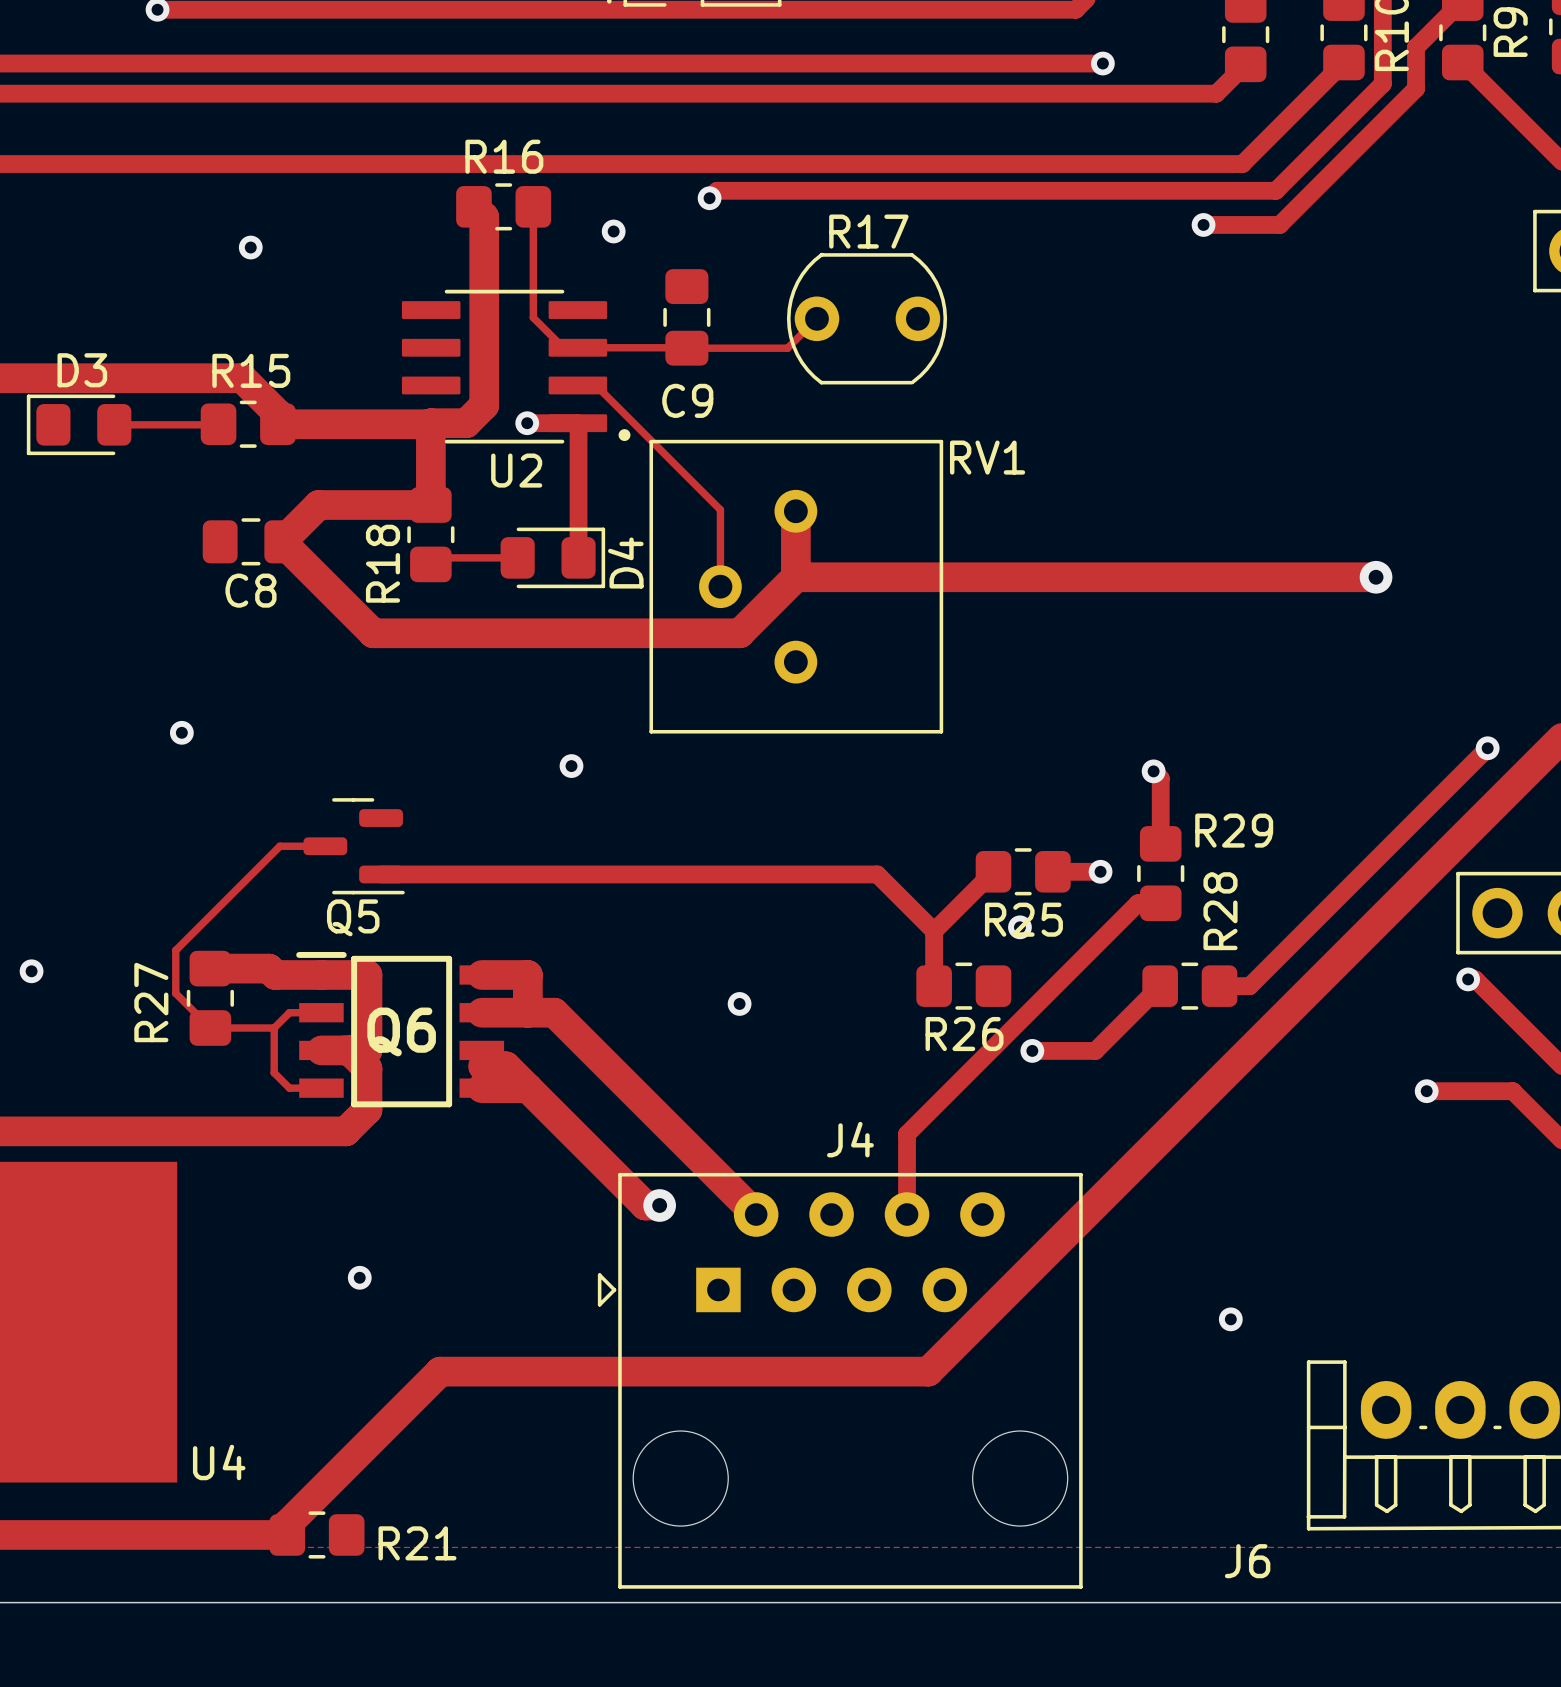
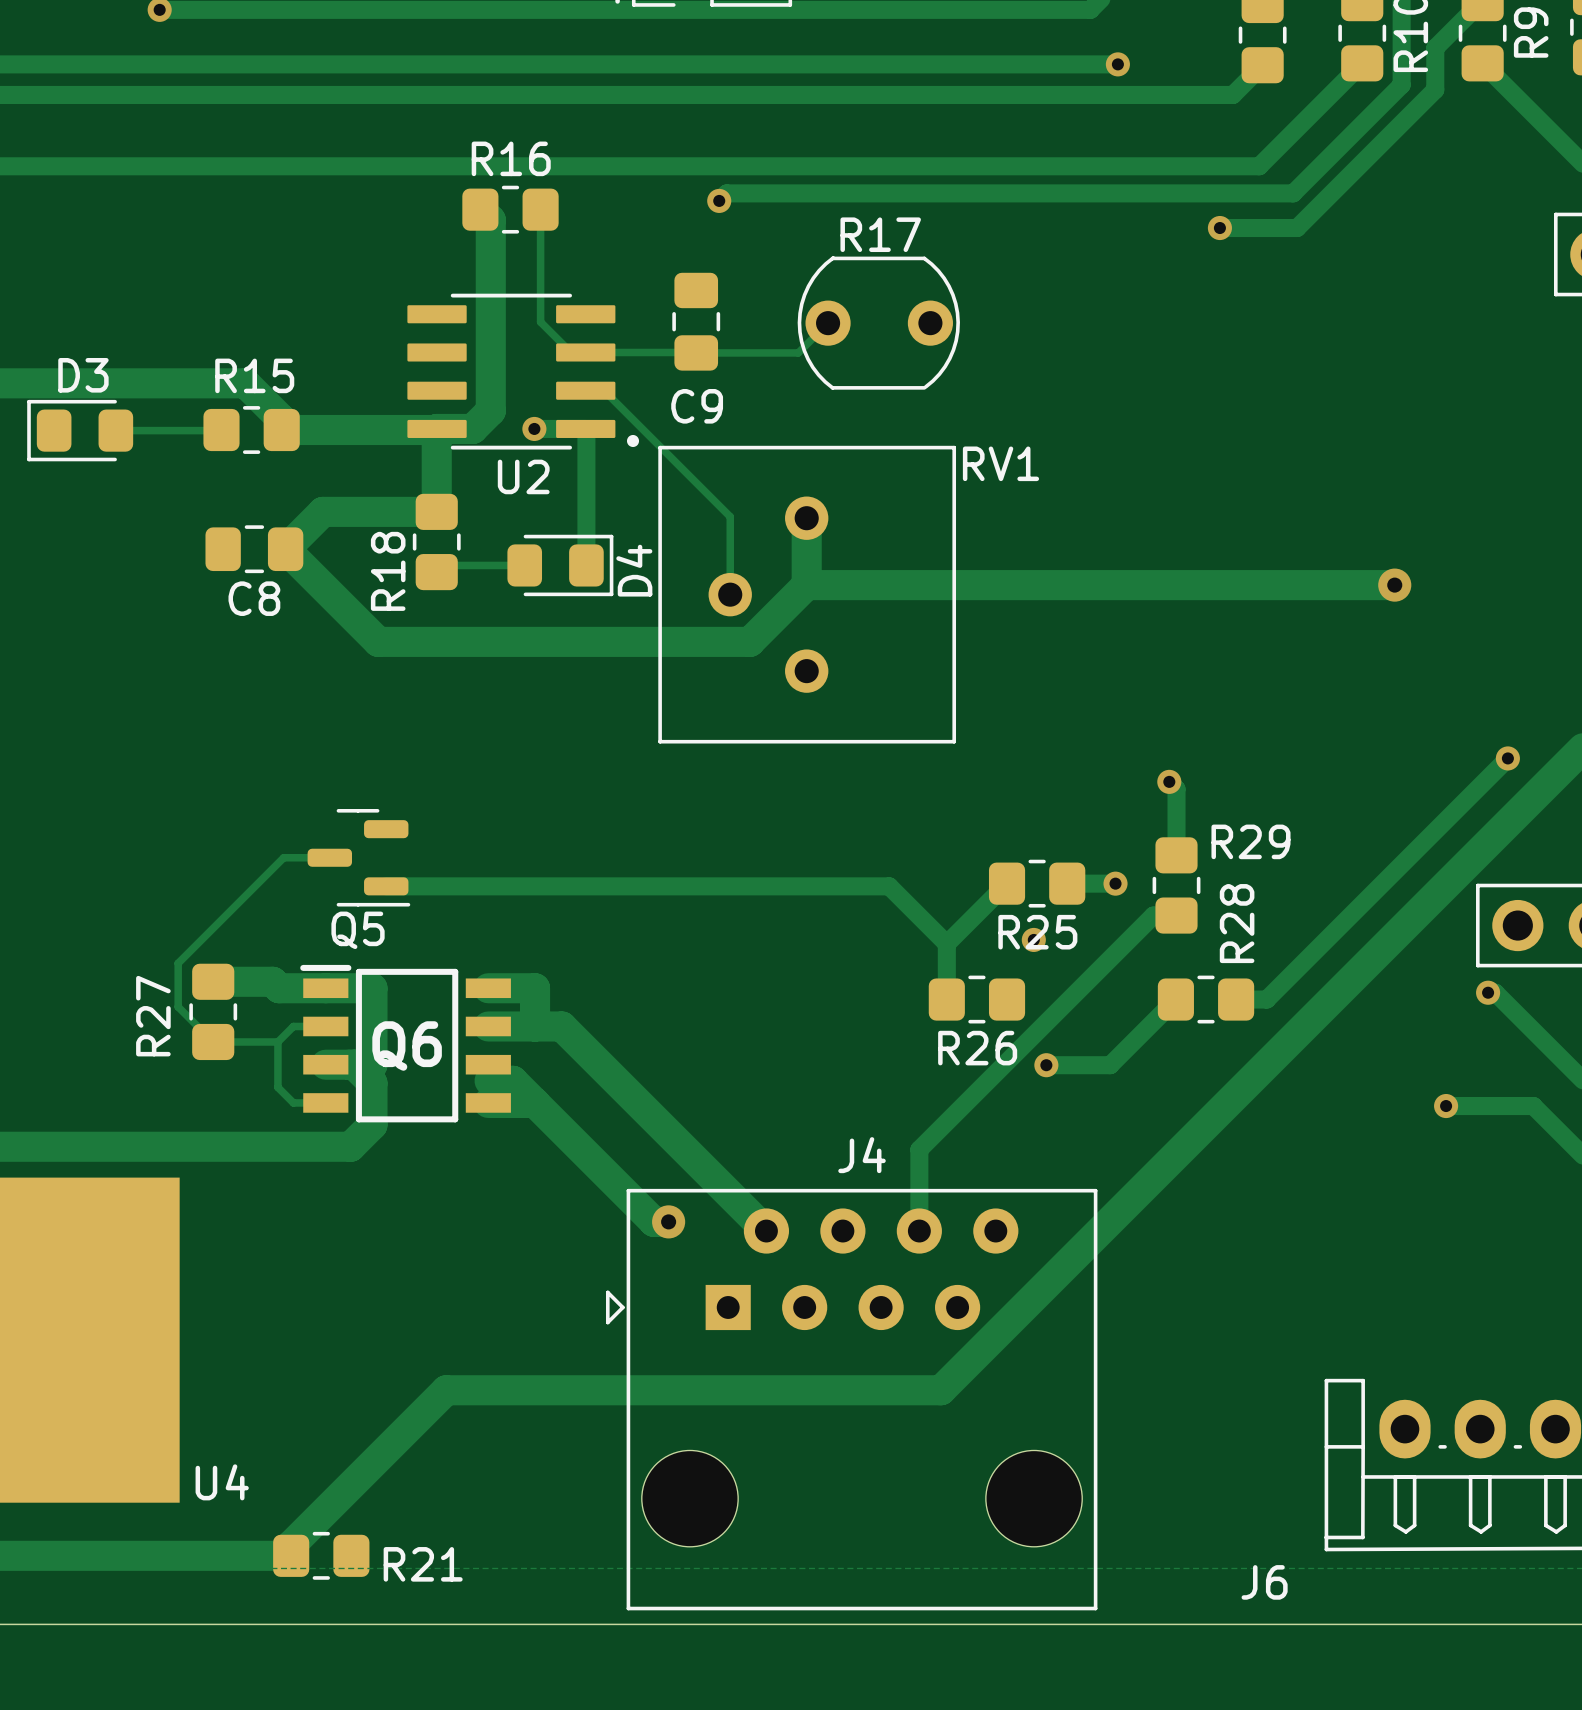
via: (613, 231) -> none
via: (250, 247) -> none
via: (181, 732) -> none
via: (571, 766) -> none
via: (31, 971) -> none
via: (739, 1003) -> none
via: (359, 1277) -> none
via: (1230, 1319) -> none

